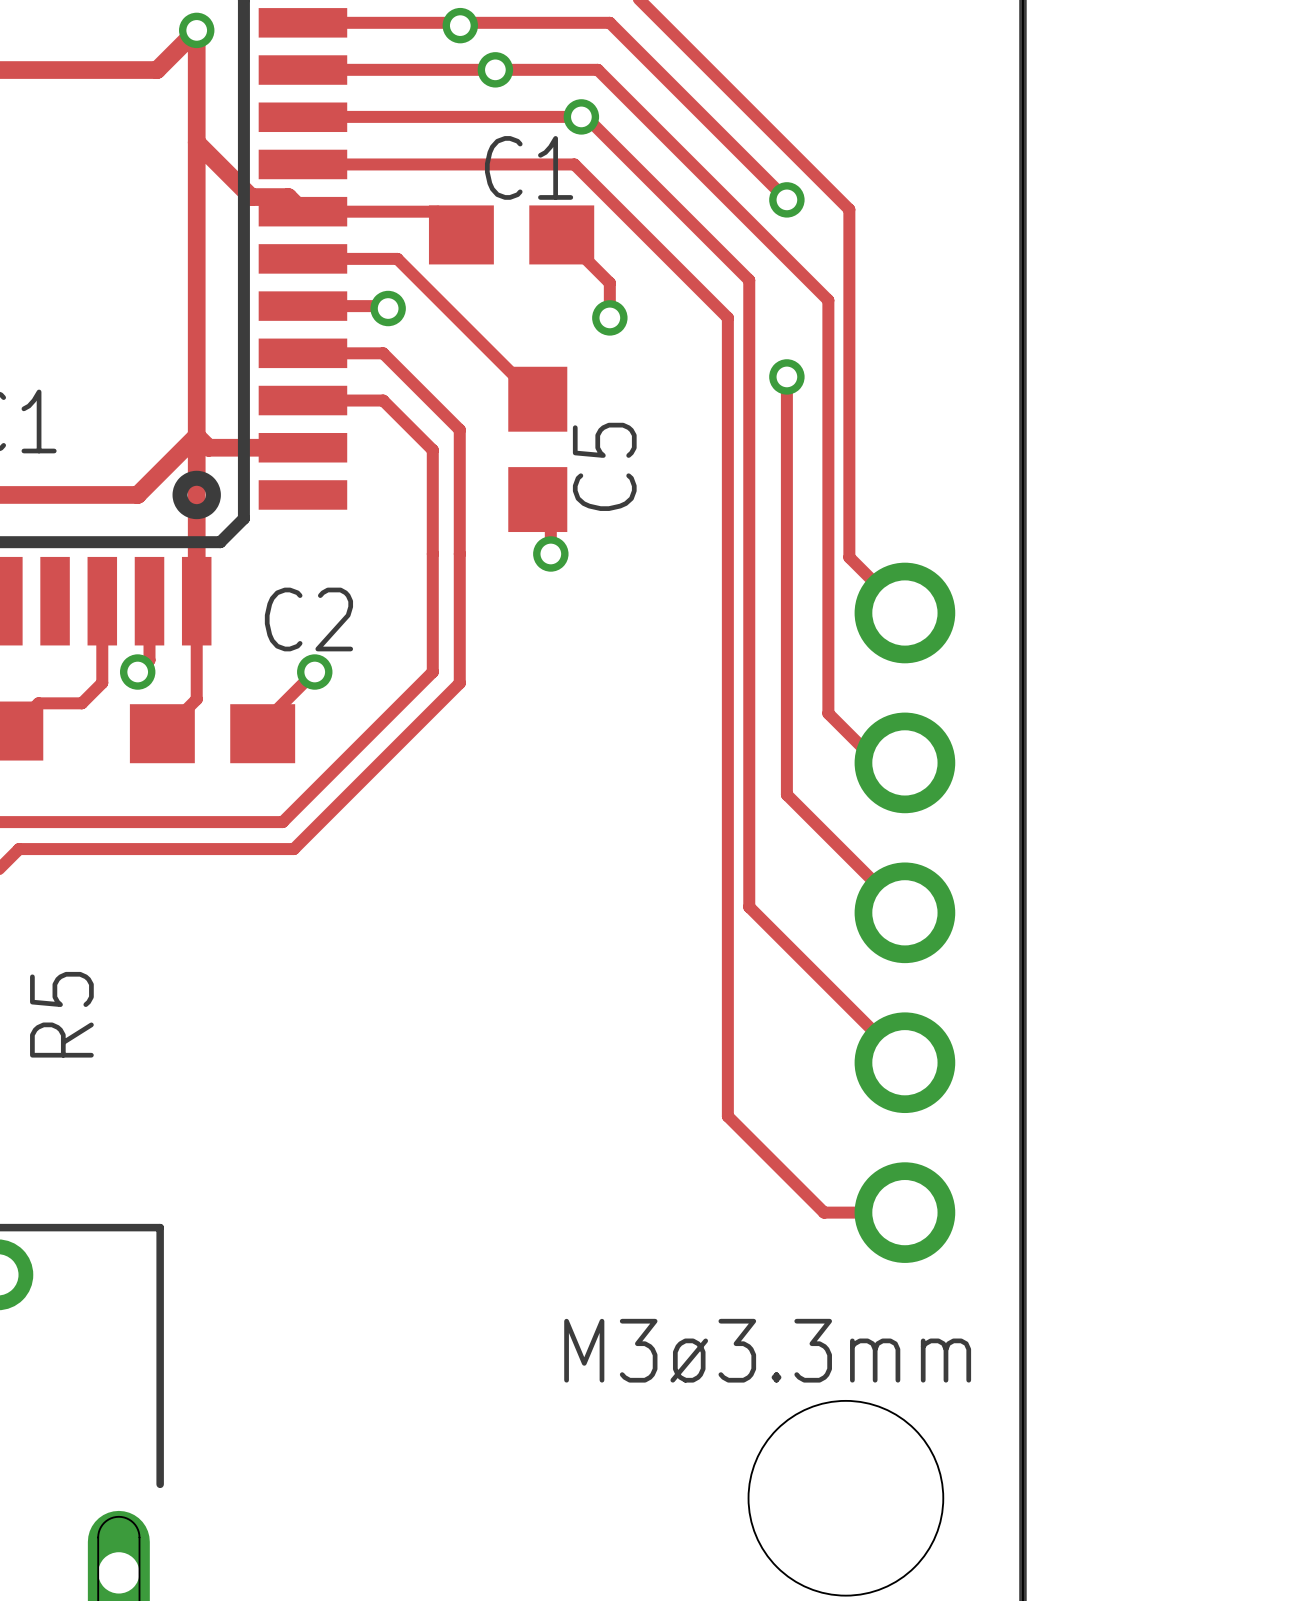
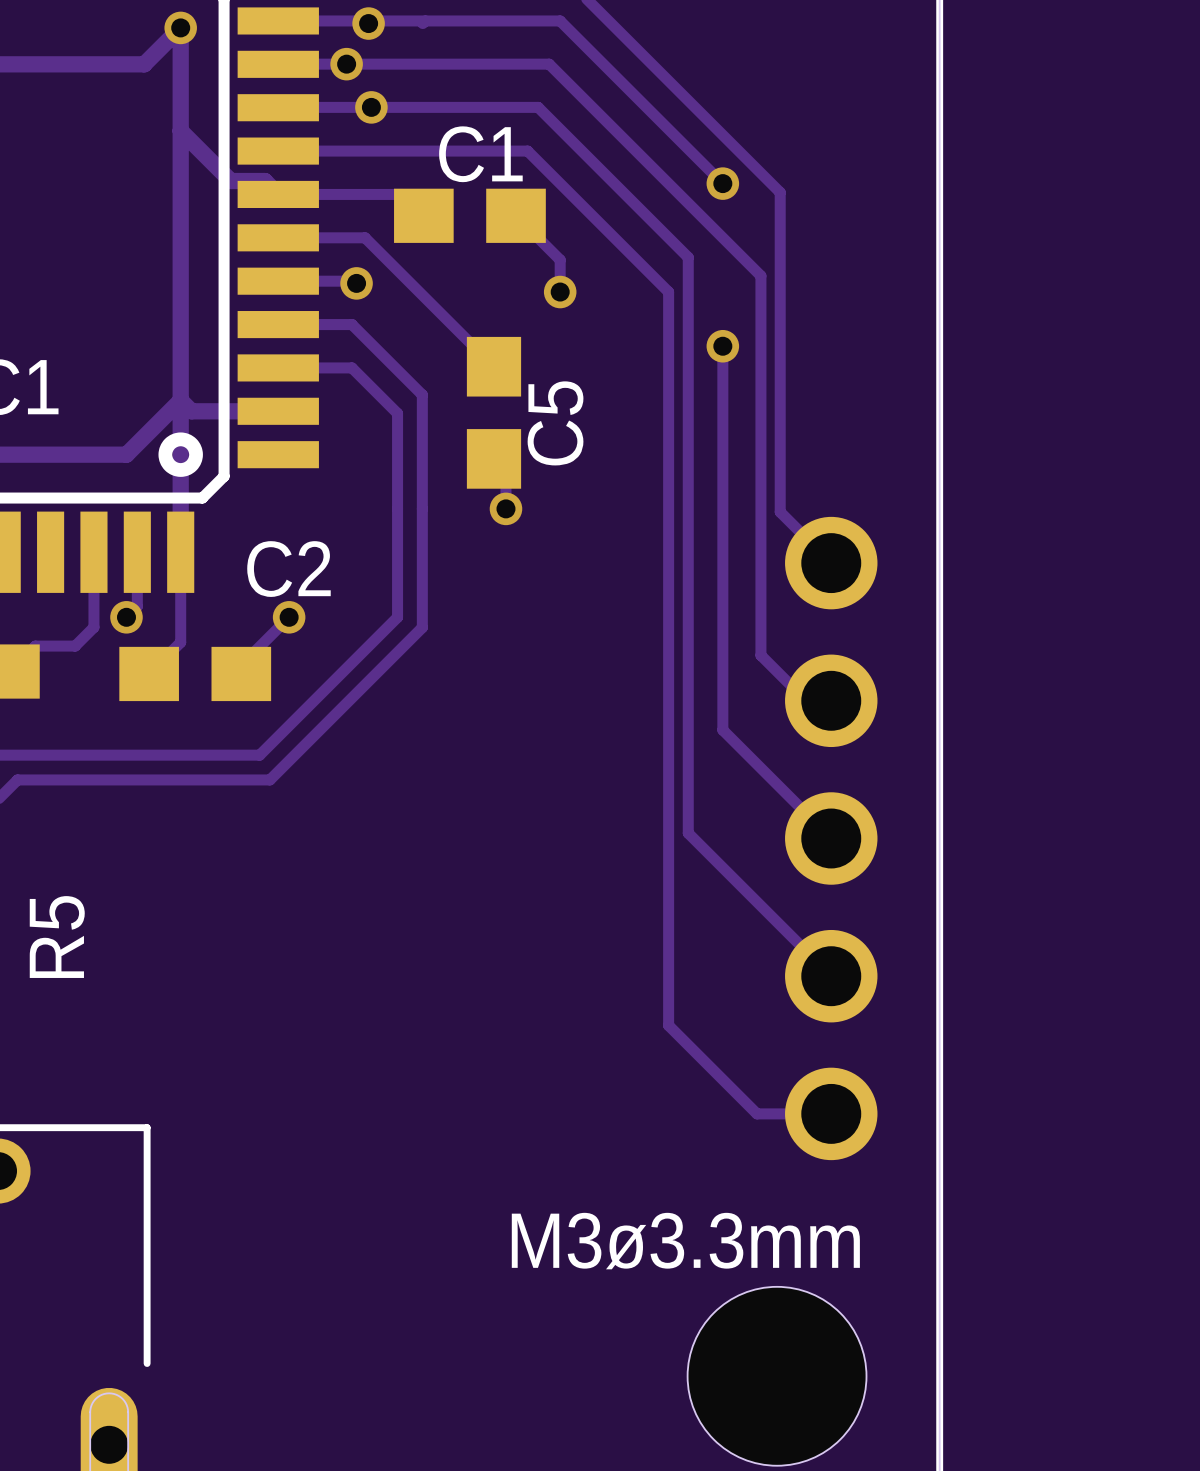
via: none -> (368, 23)
via: (460, 25) -> none
via: none -> (346, 64)
via: (495, 69) -> none
via: none -> (371, 107)
via: (581, 116) -> none

